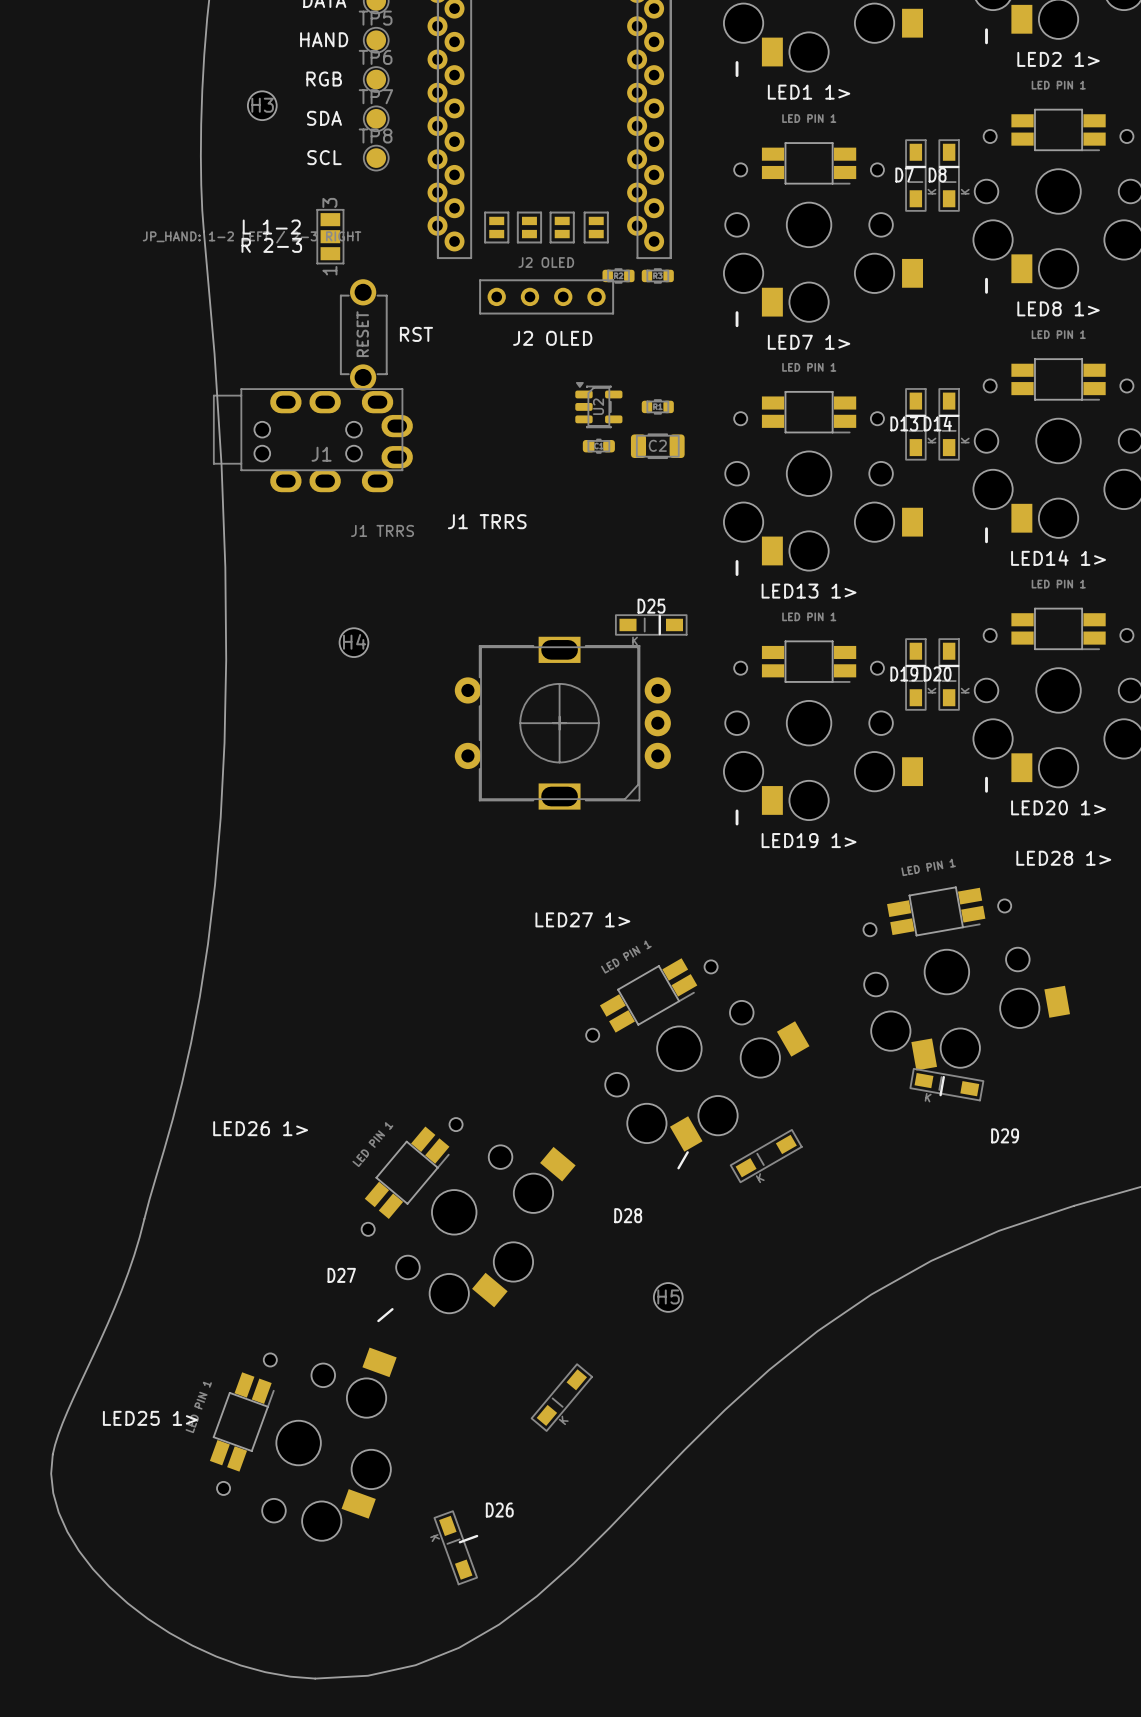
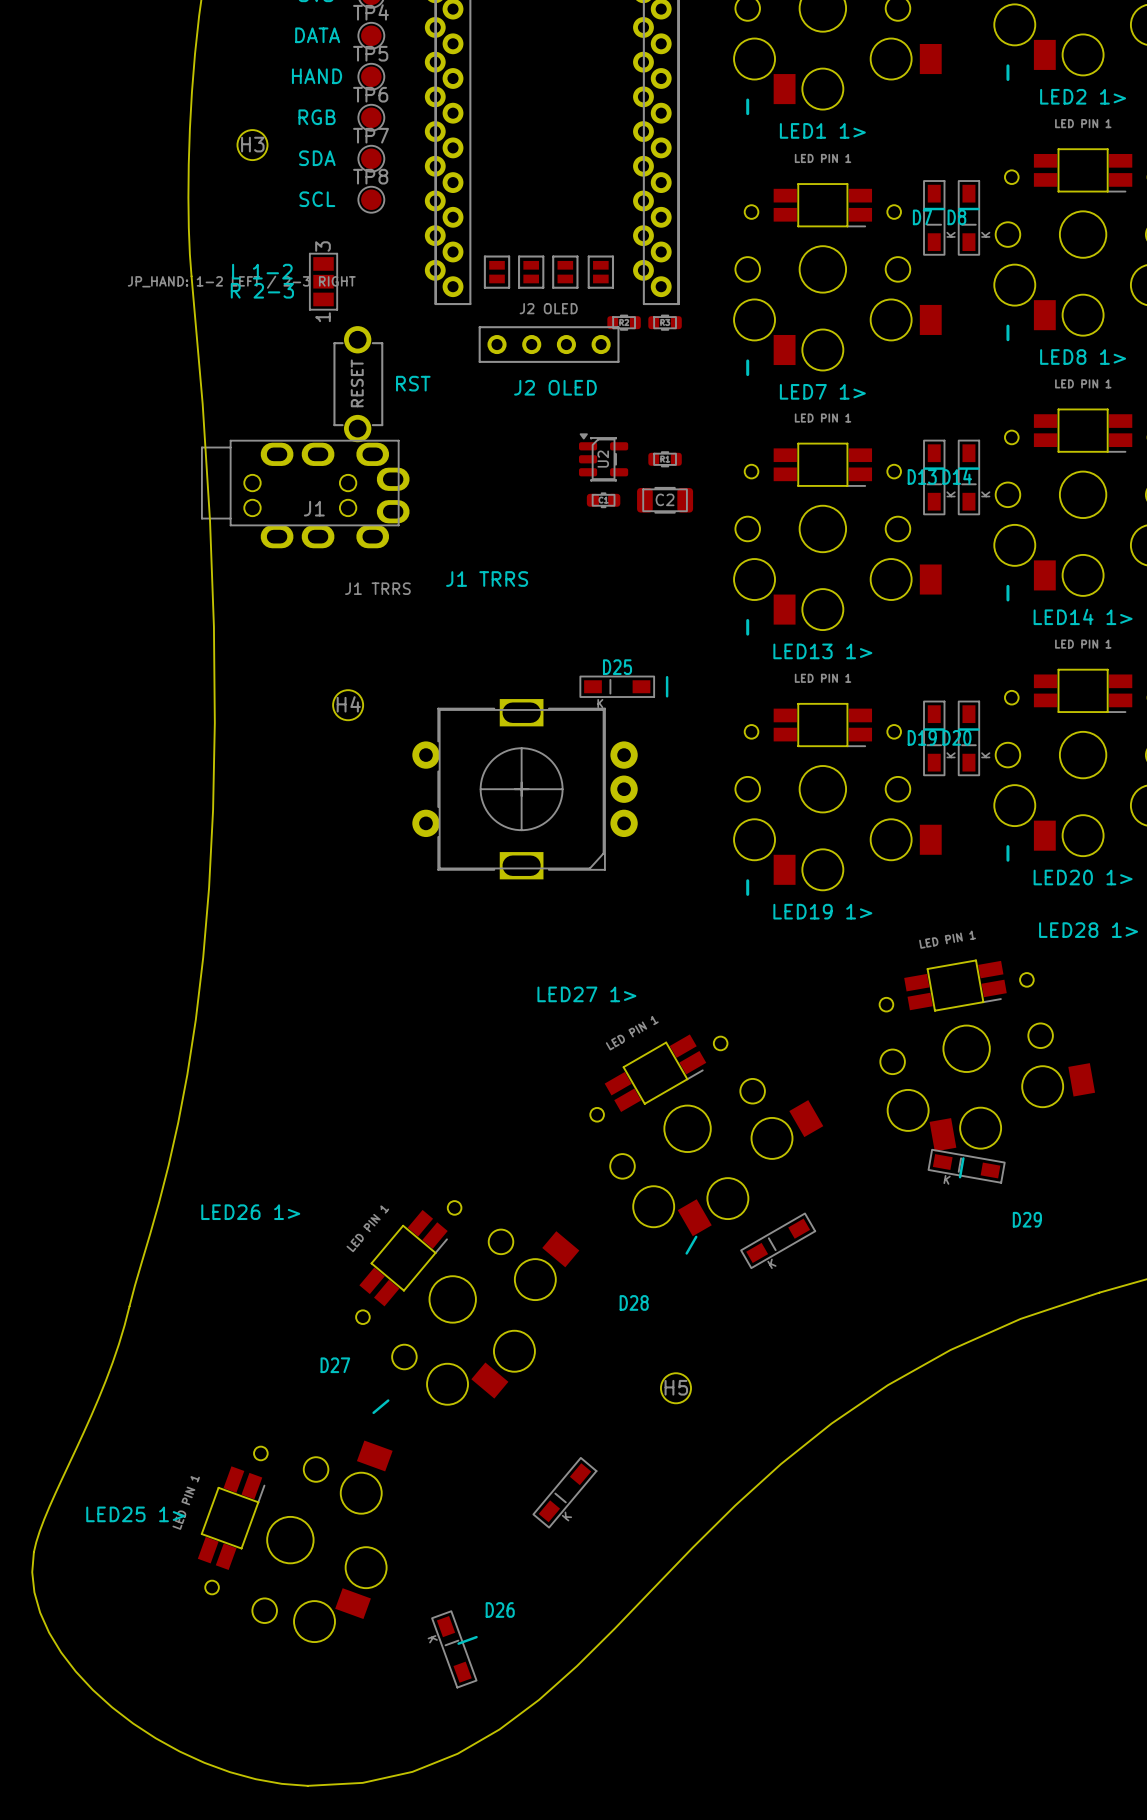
text position: D25 (651, 606) -> D25 (617, 667)
part position: (651, 624) -> (617, 686)
part position: (562, 723) -> (525, 789)

